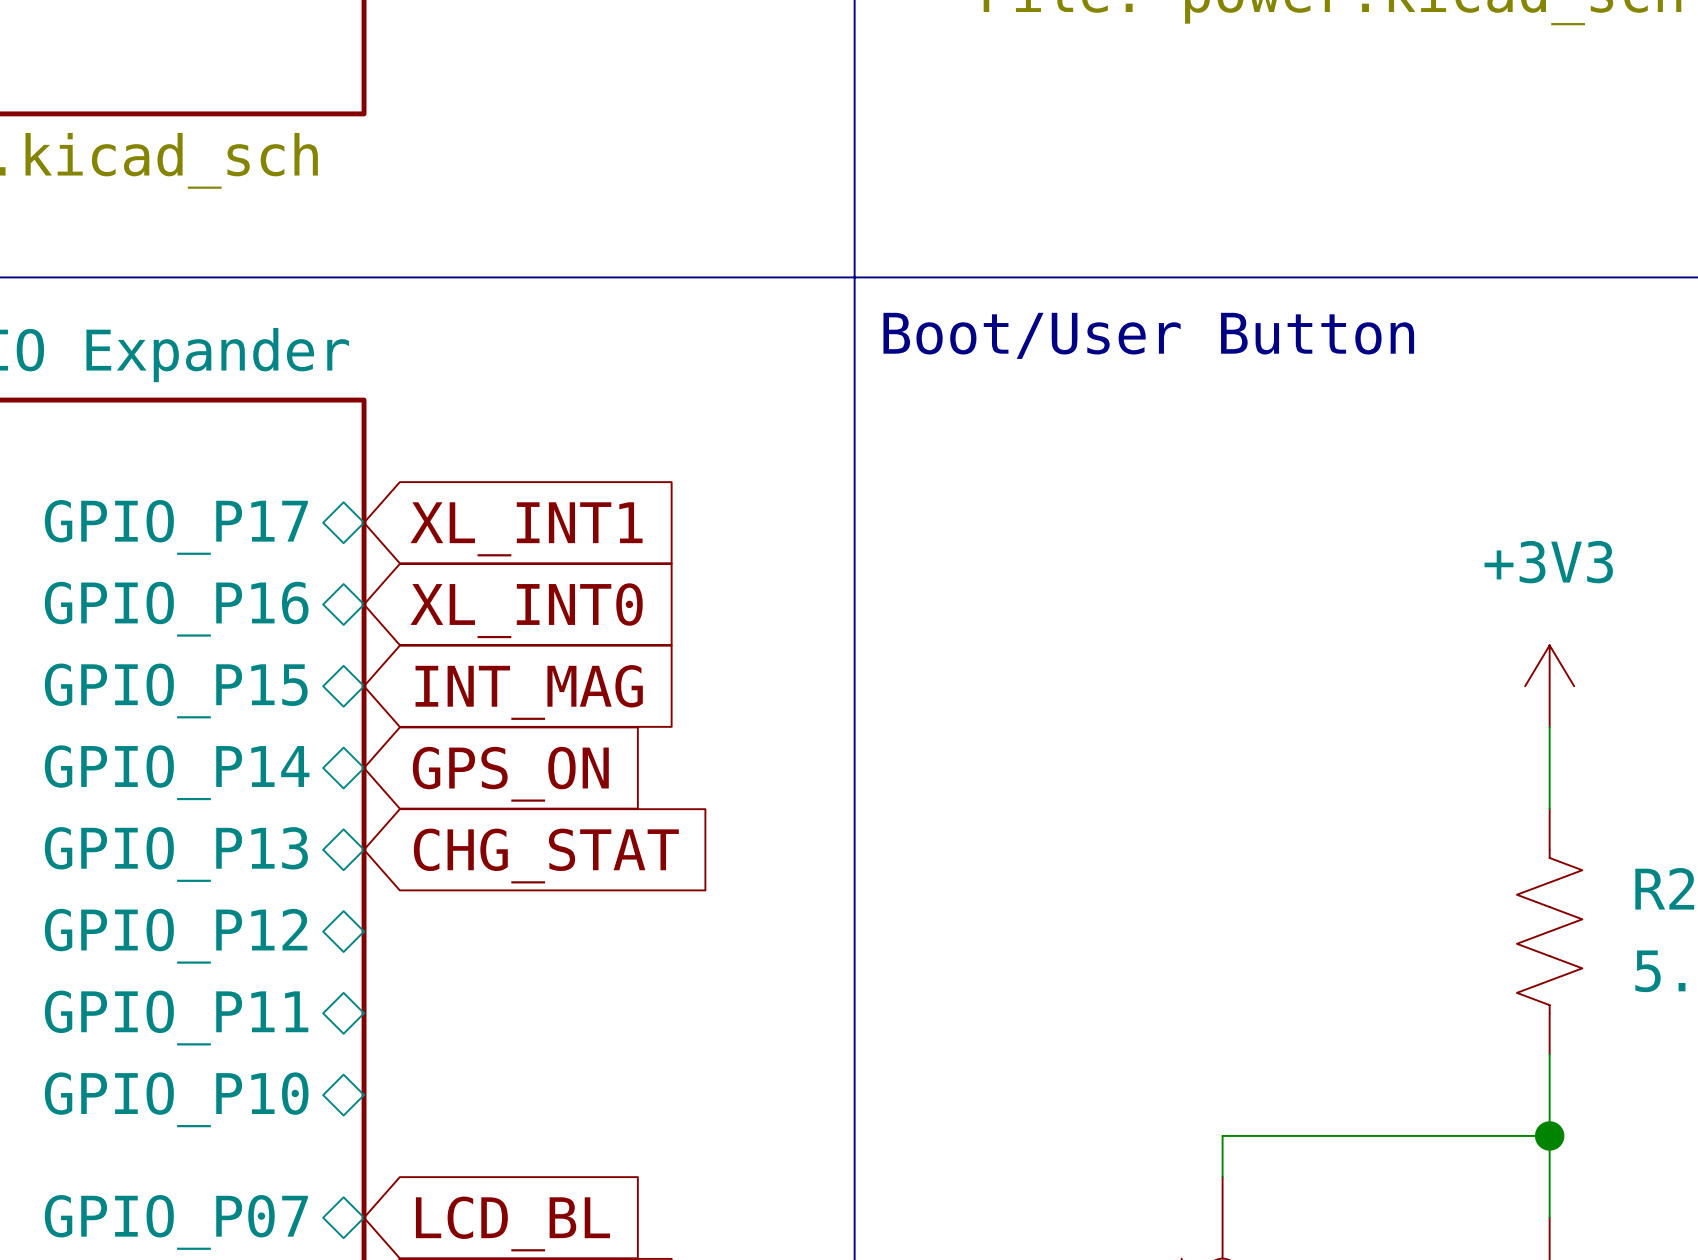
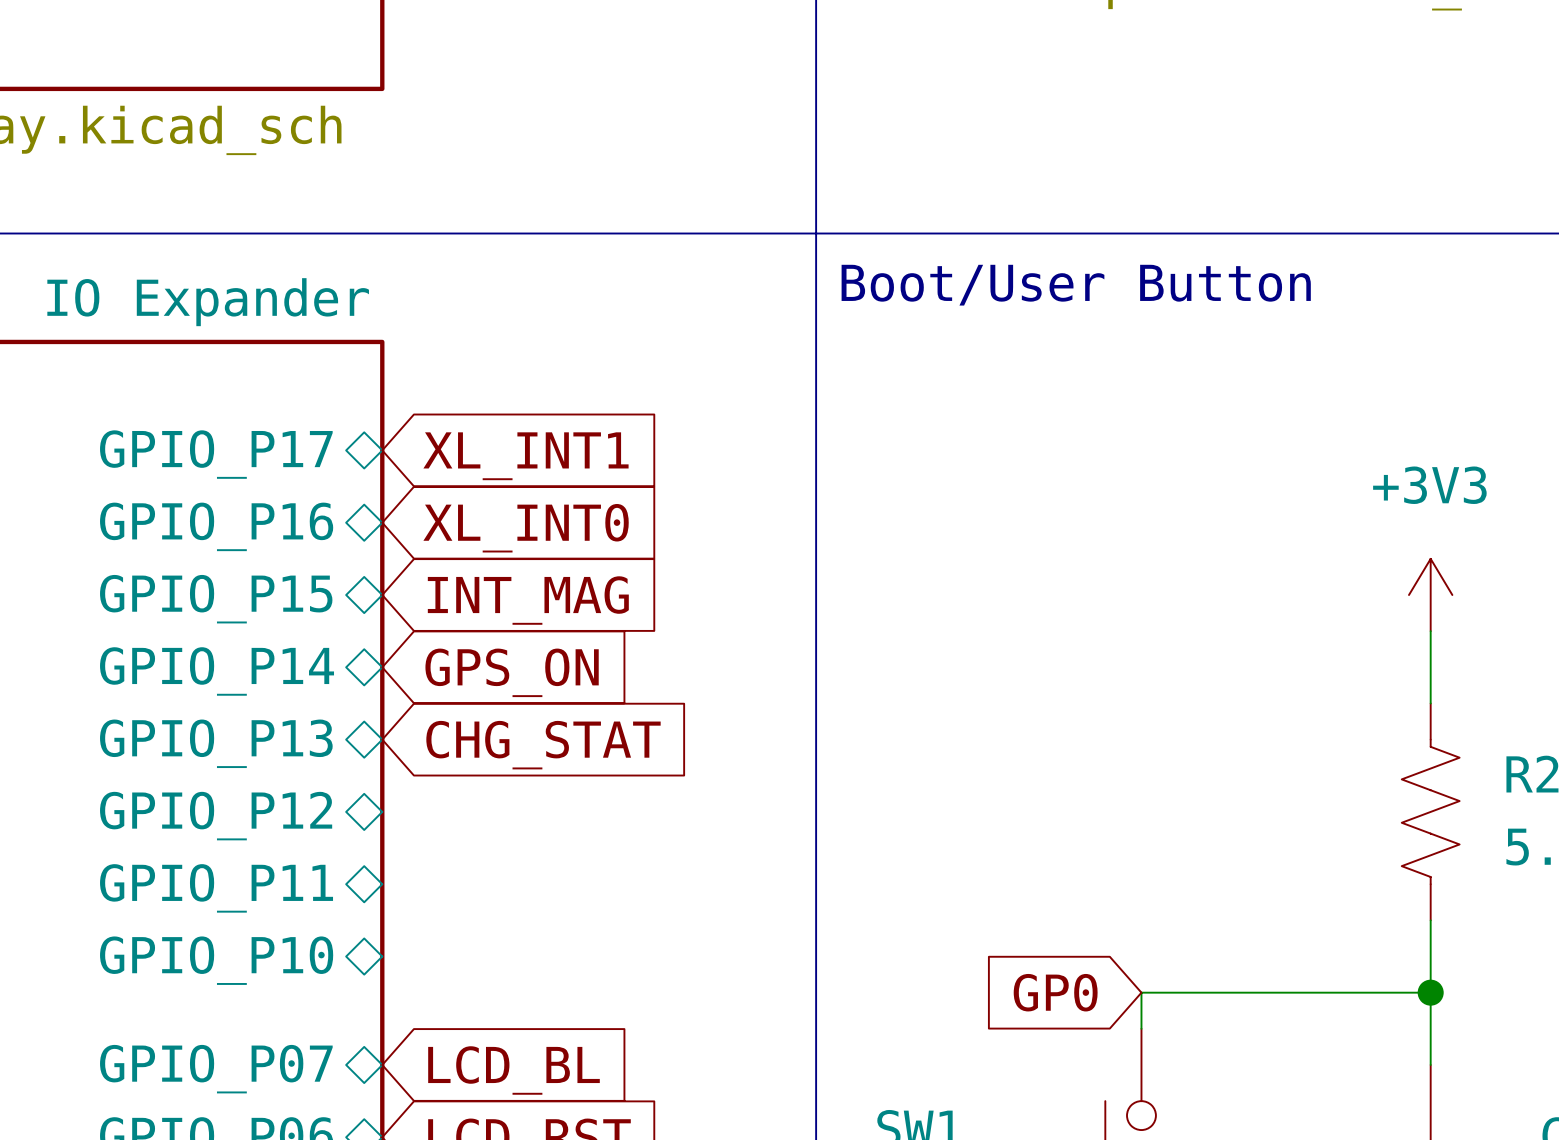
global label: none -> GP0 (1055, 992)

